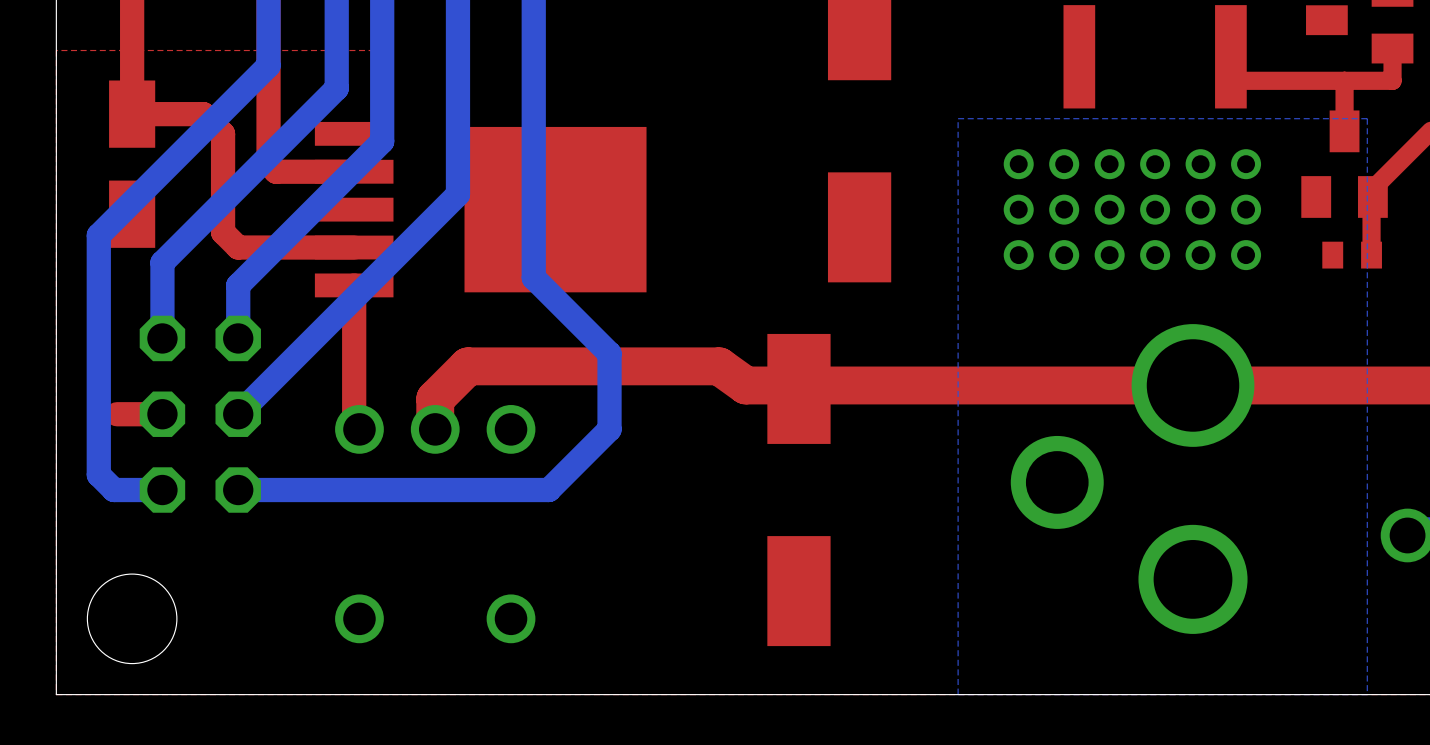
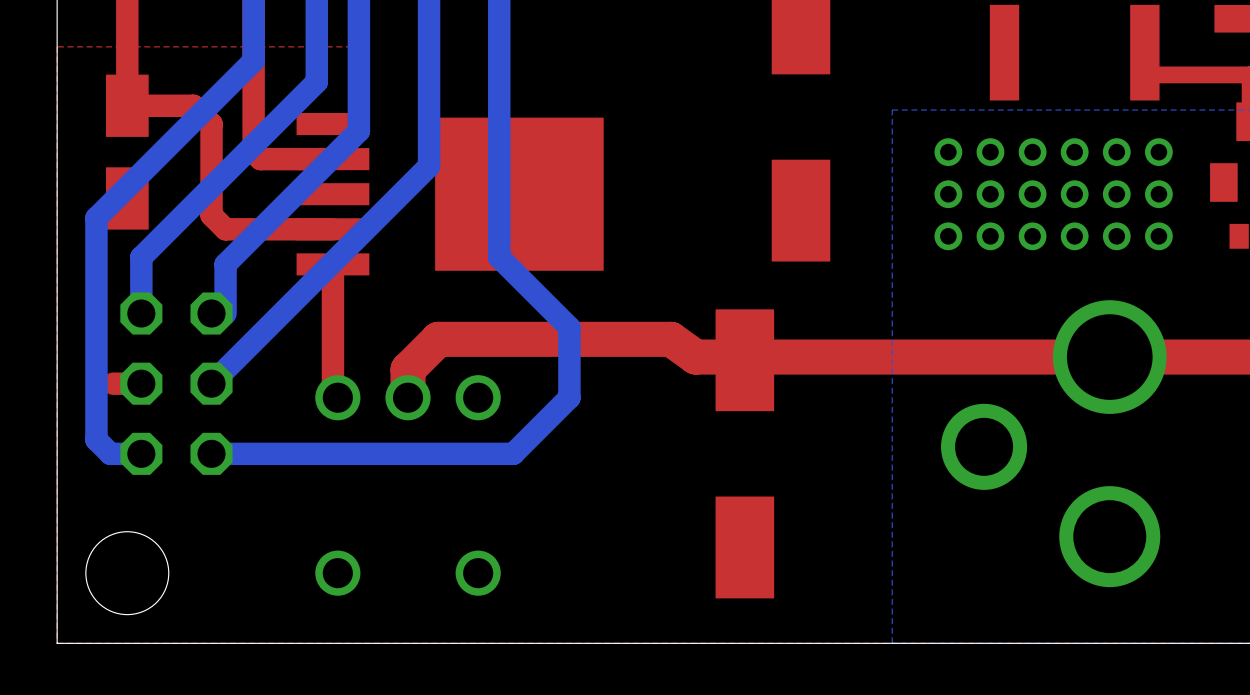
bottom track: (457, 179) (457, 194) (238, 414) -> (429, 166) (211, 383)
bottom track: (162, 262) (162, 338) -> (155, 243) (141, 257) (141, 313)
part position: (200, 414) -> (176, 383)

